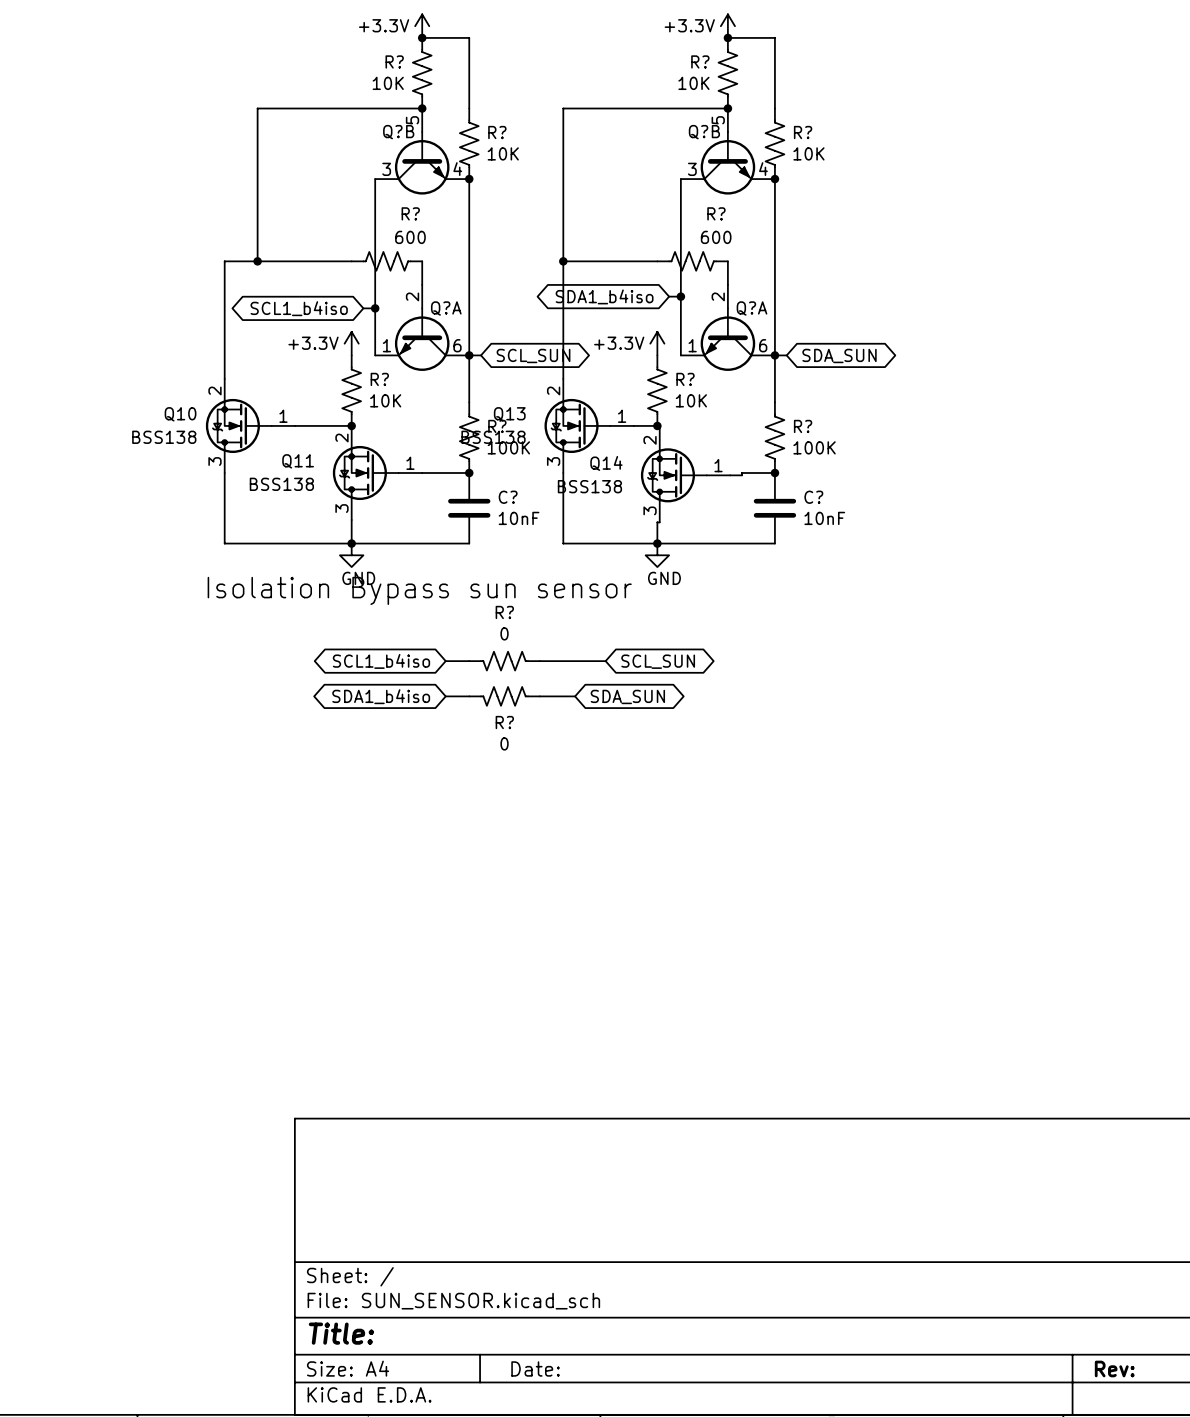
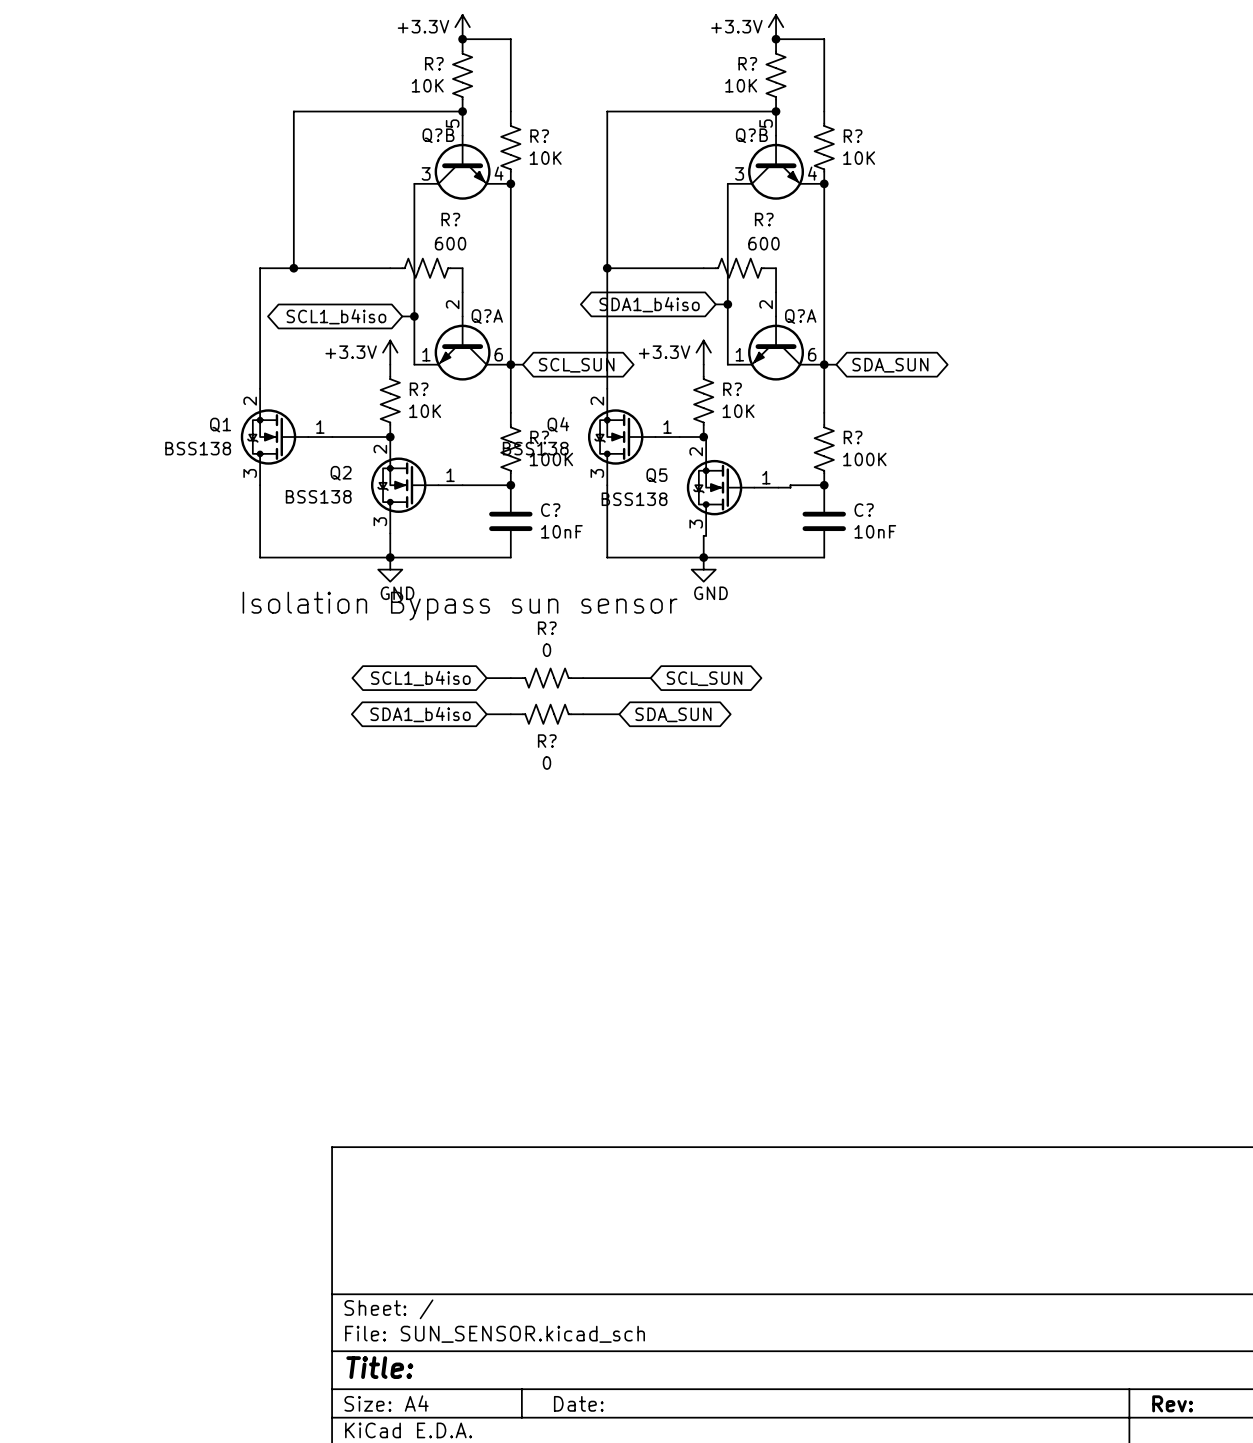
Q10 name: Q10 (180, 414) -> Q1 (220, 425)
Q13 name: Q13 (509, 414) -> Q4 (558, 424)
Q11 name: Q11 (298, 461) -> Q2 (341, 473)
Q14 name: Q14 (606, 463) -> Q5 (656, 475)

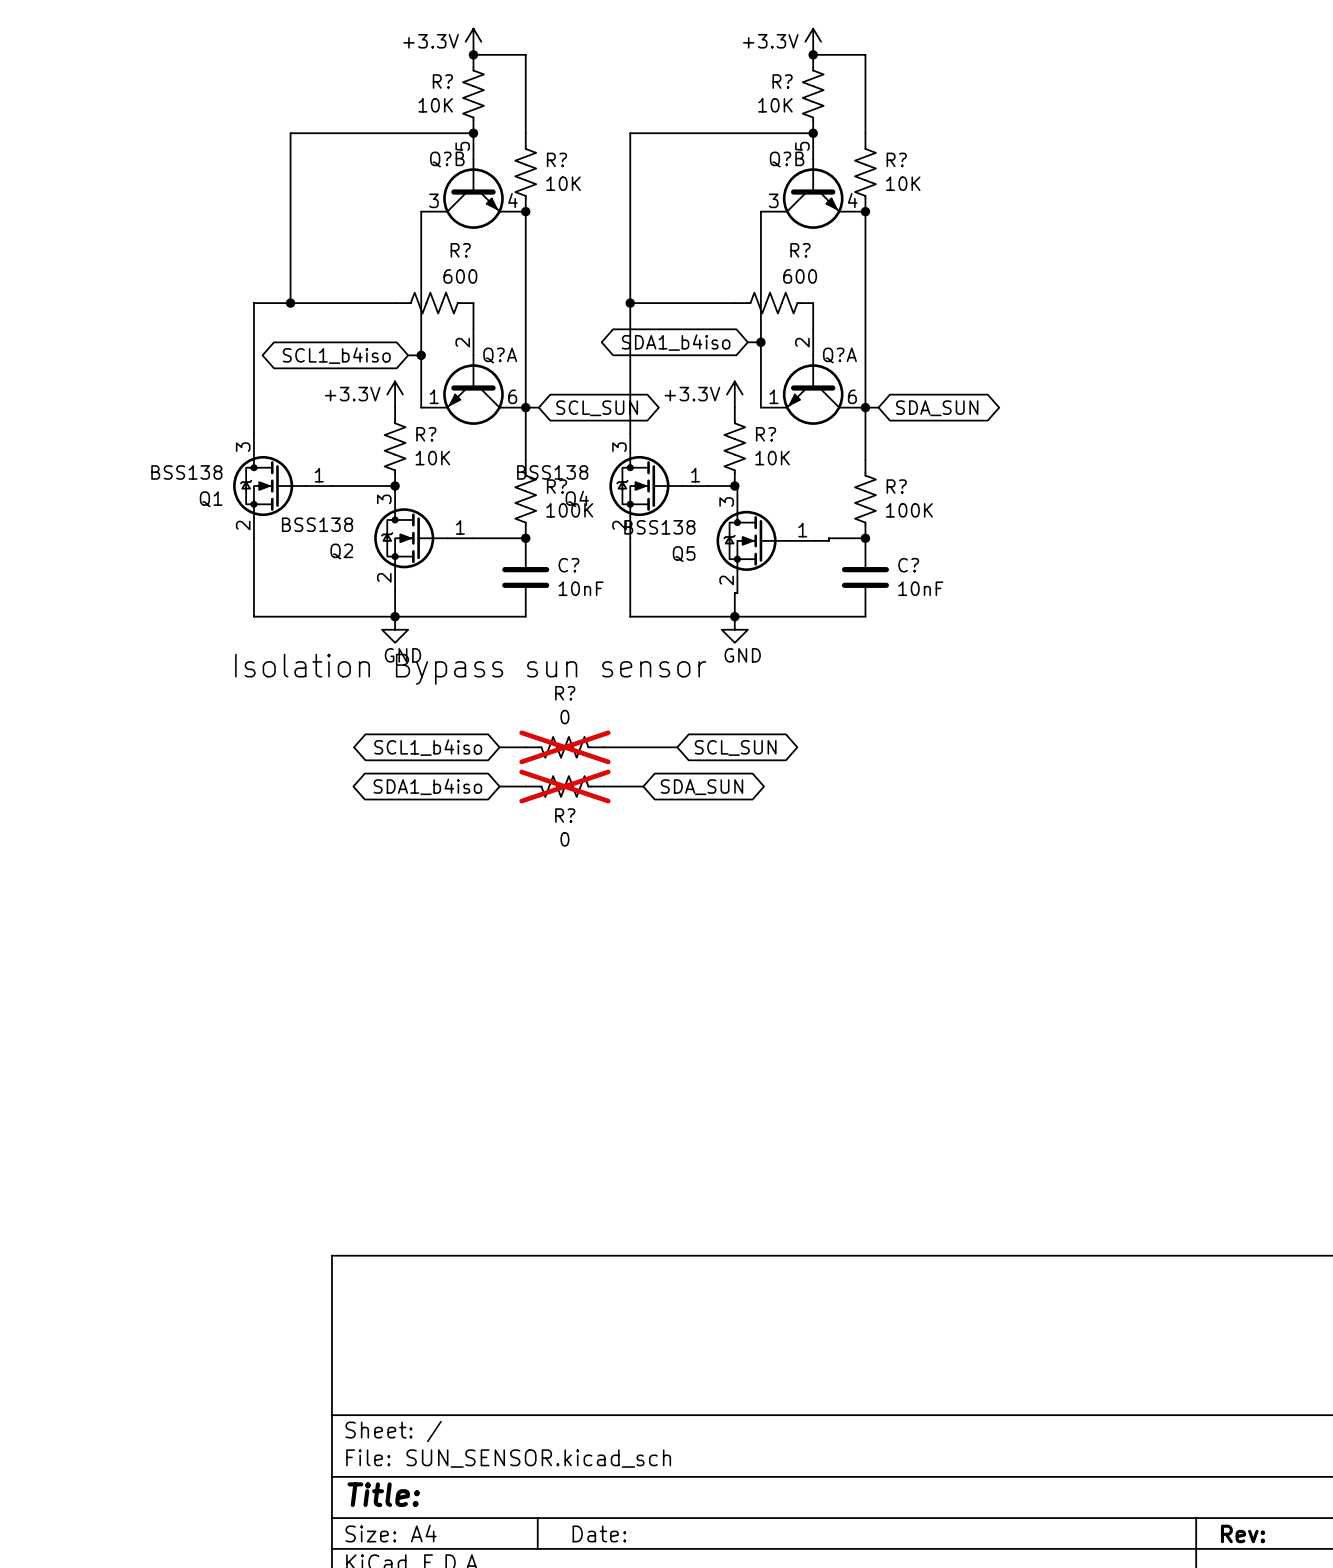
Q1 flip: as is (274, 437) -> up-down (269, 486)
Q4 flip: as is (621, 437) -> up-down (645, 486)
Q2 flip: as is (404, 485) -> up-down (410, 538)
Q5 flip: as is (720, 487) -> up-down (753, 540)
R? do-not-place cross: none -> (564, 747)
R? do-not-place cross: none -> (564, 786)

